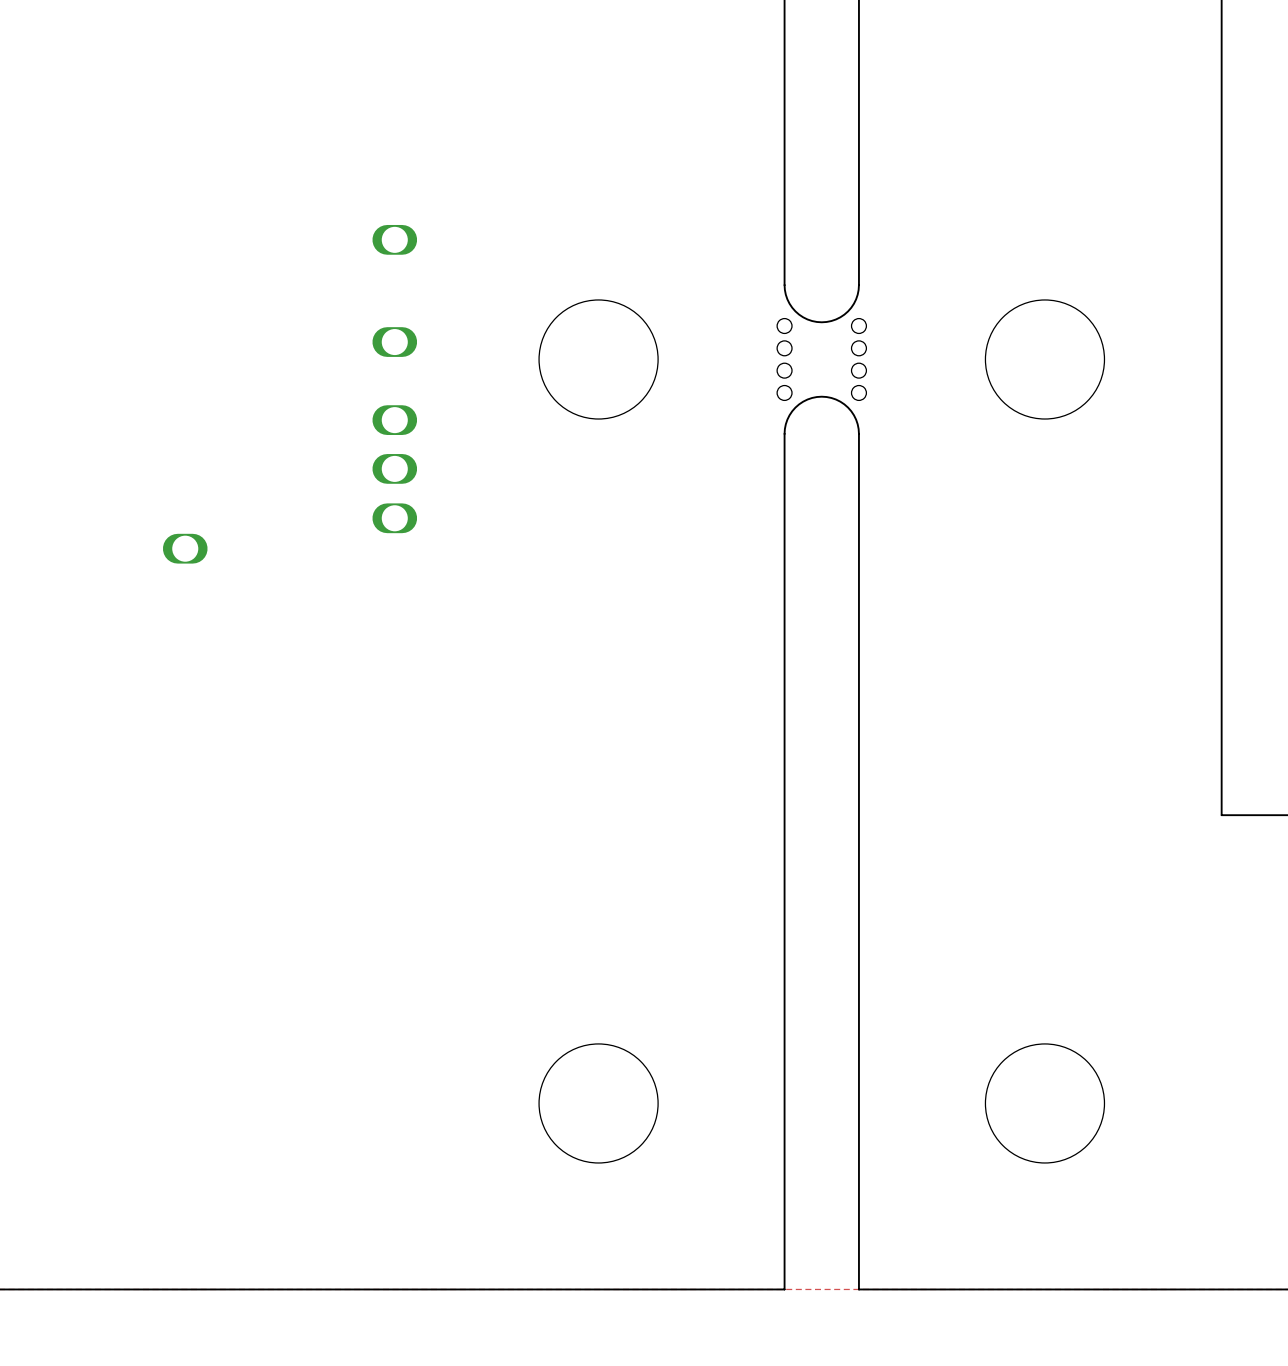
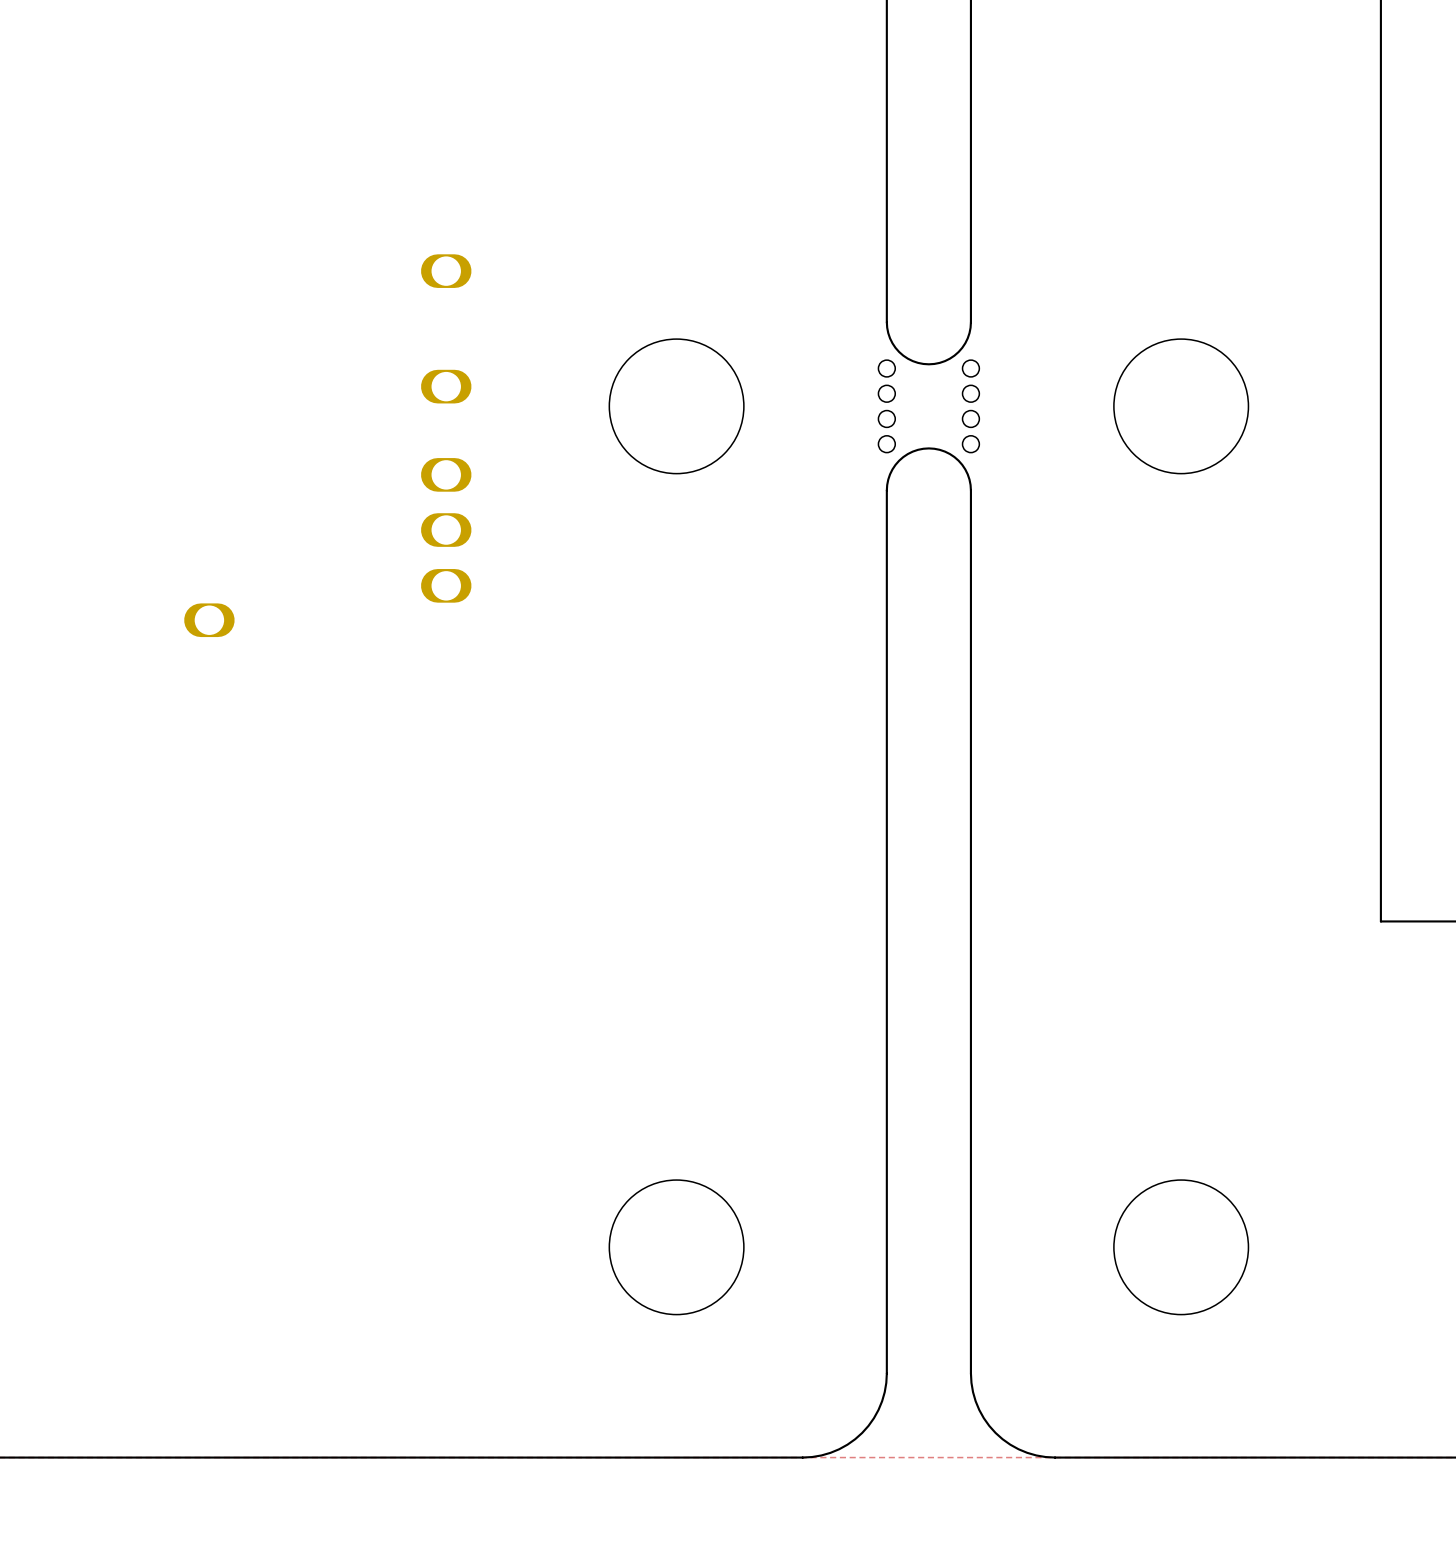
board edge: (784, 1215) (784, 1289) (710, 1289) -> (886, 1373) (882, 1401) (873, 1418) (862, 1432) (839, 1449) (821, 1455) (802, 1457)
board edge: (858, 1215) (858, 1289) (933, 1289) -> (970, 1373) (975, 1401) (983, 1418) (995, 1432) (1010, 1444) (1027, 1452) (1055, 1457)

